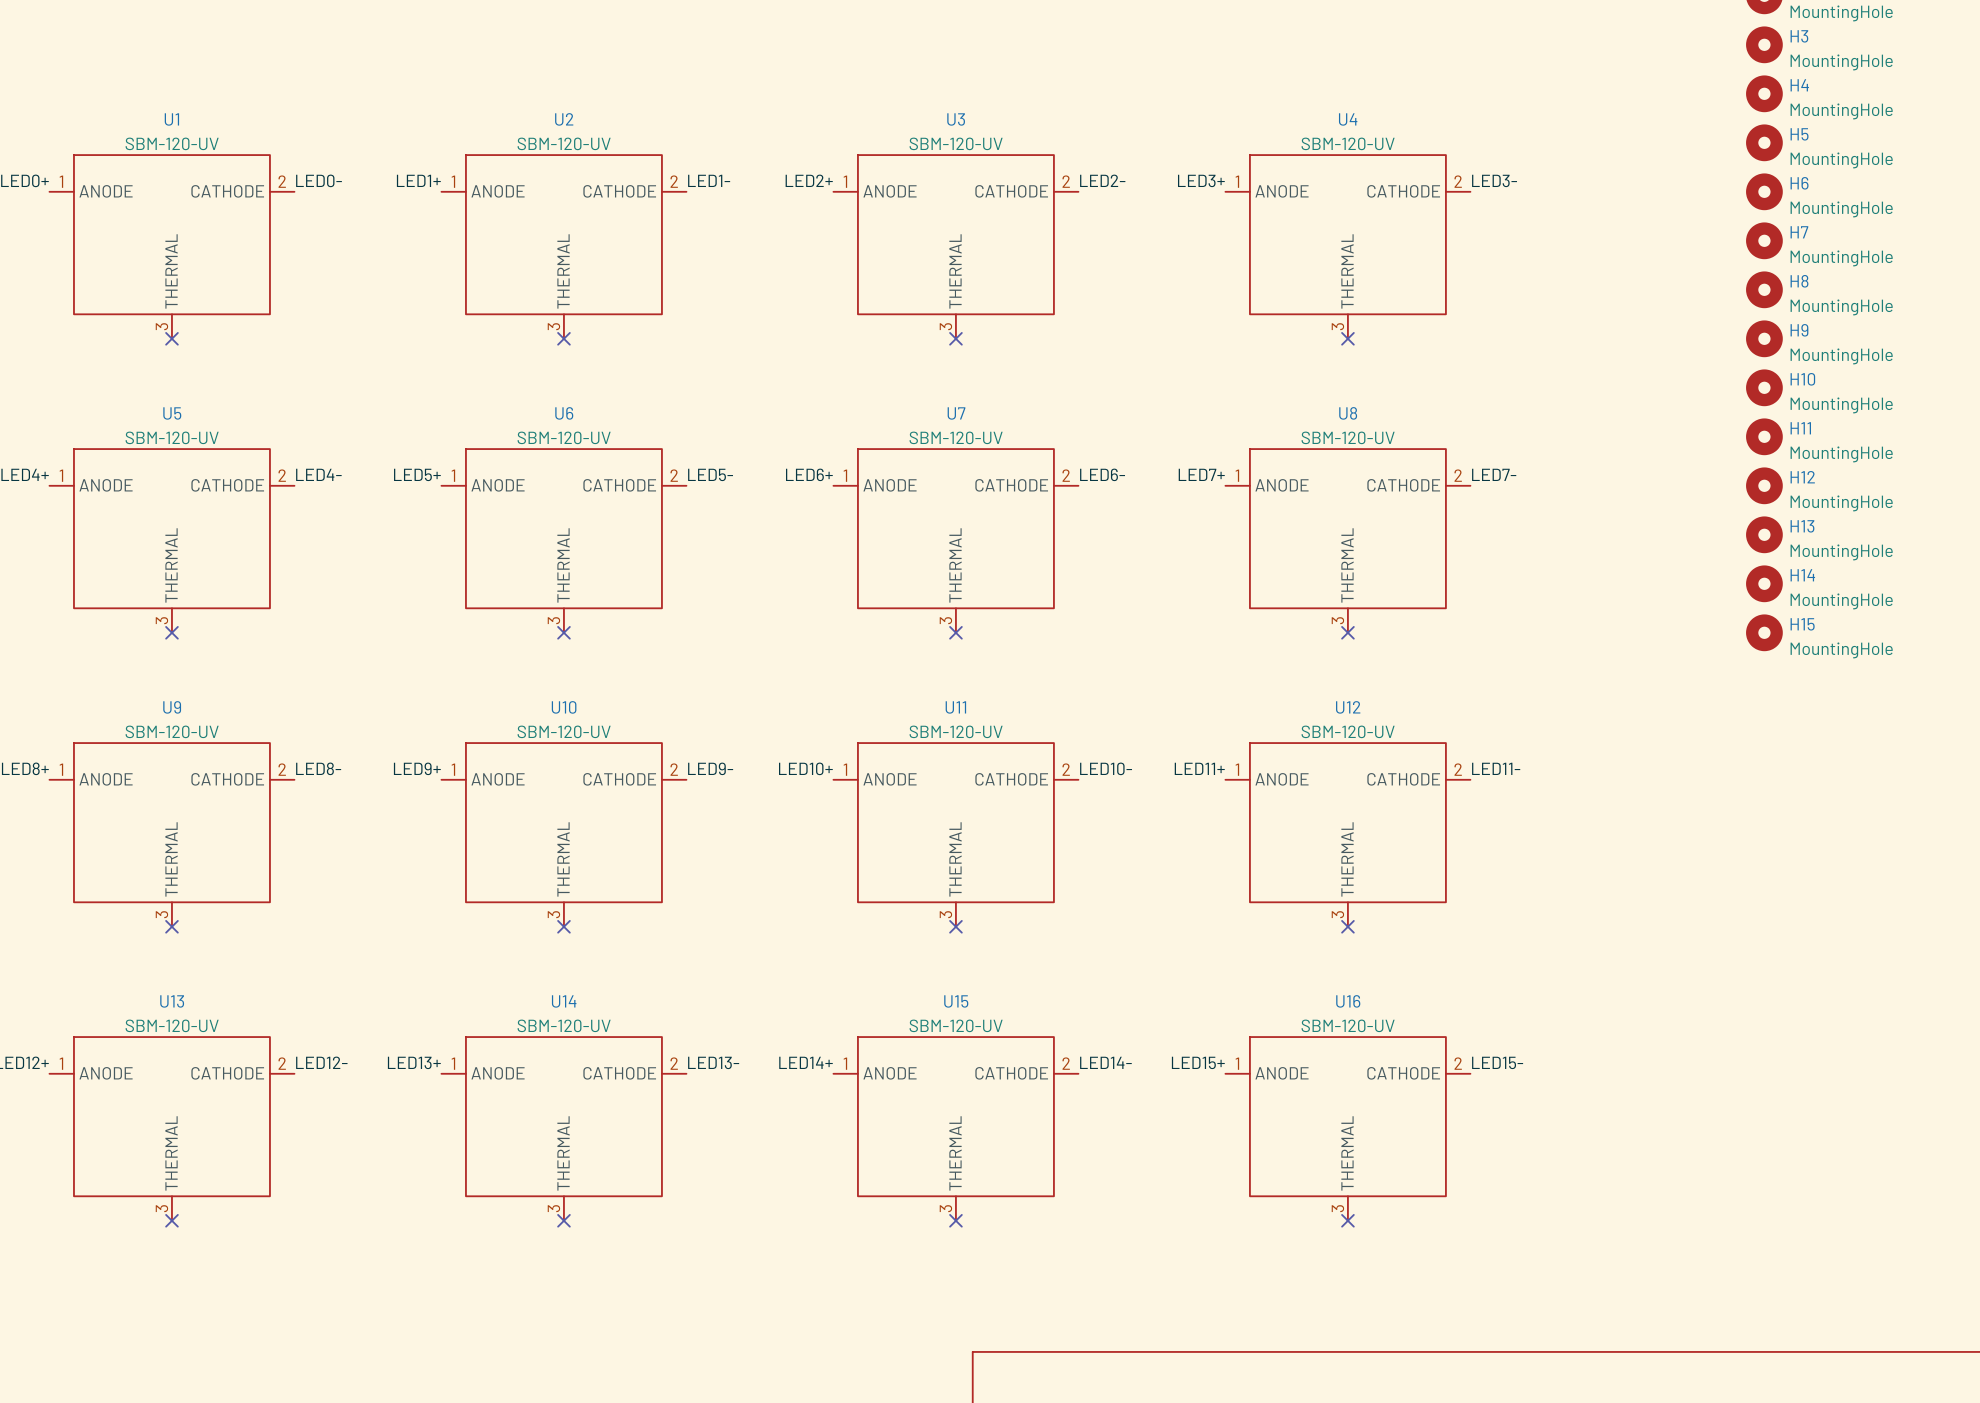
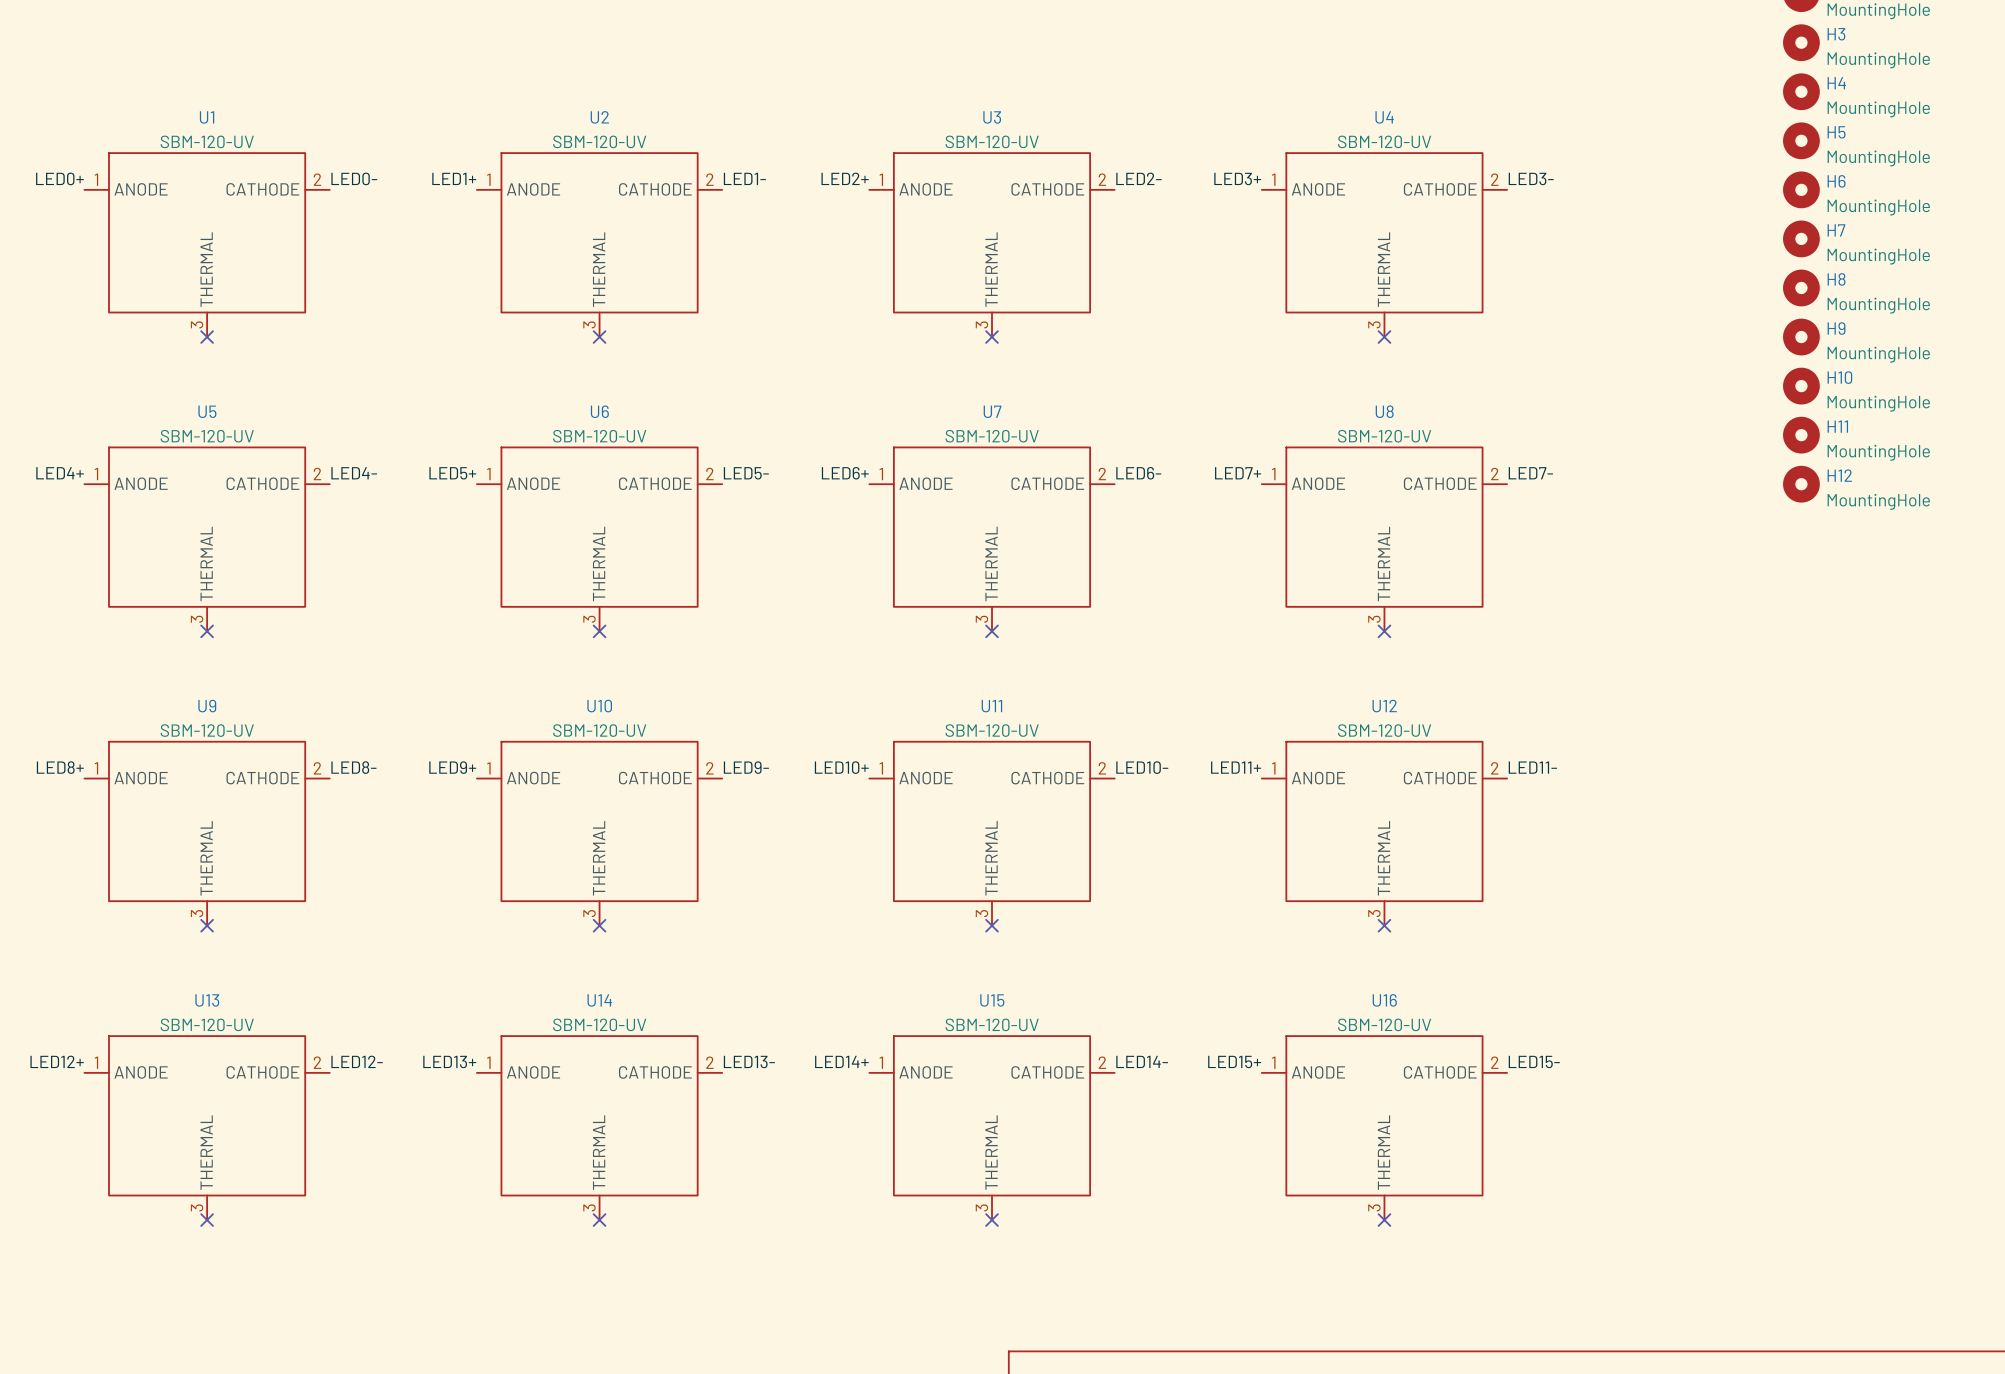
H13: MountingHole (1764, 534) -> none
H14: MountingHole (1764, 583) -> none
H15: MountingHole (1764, 632) -> none

